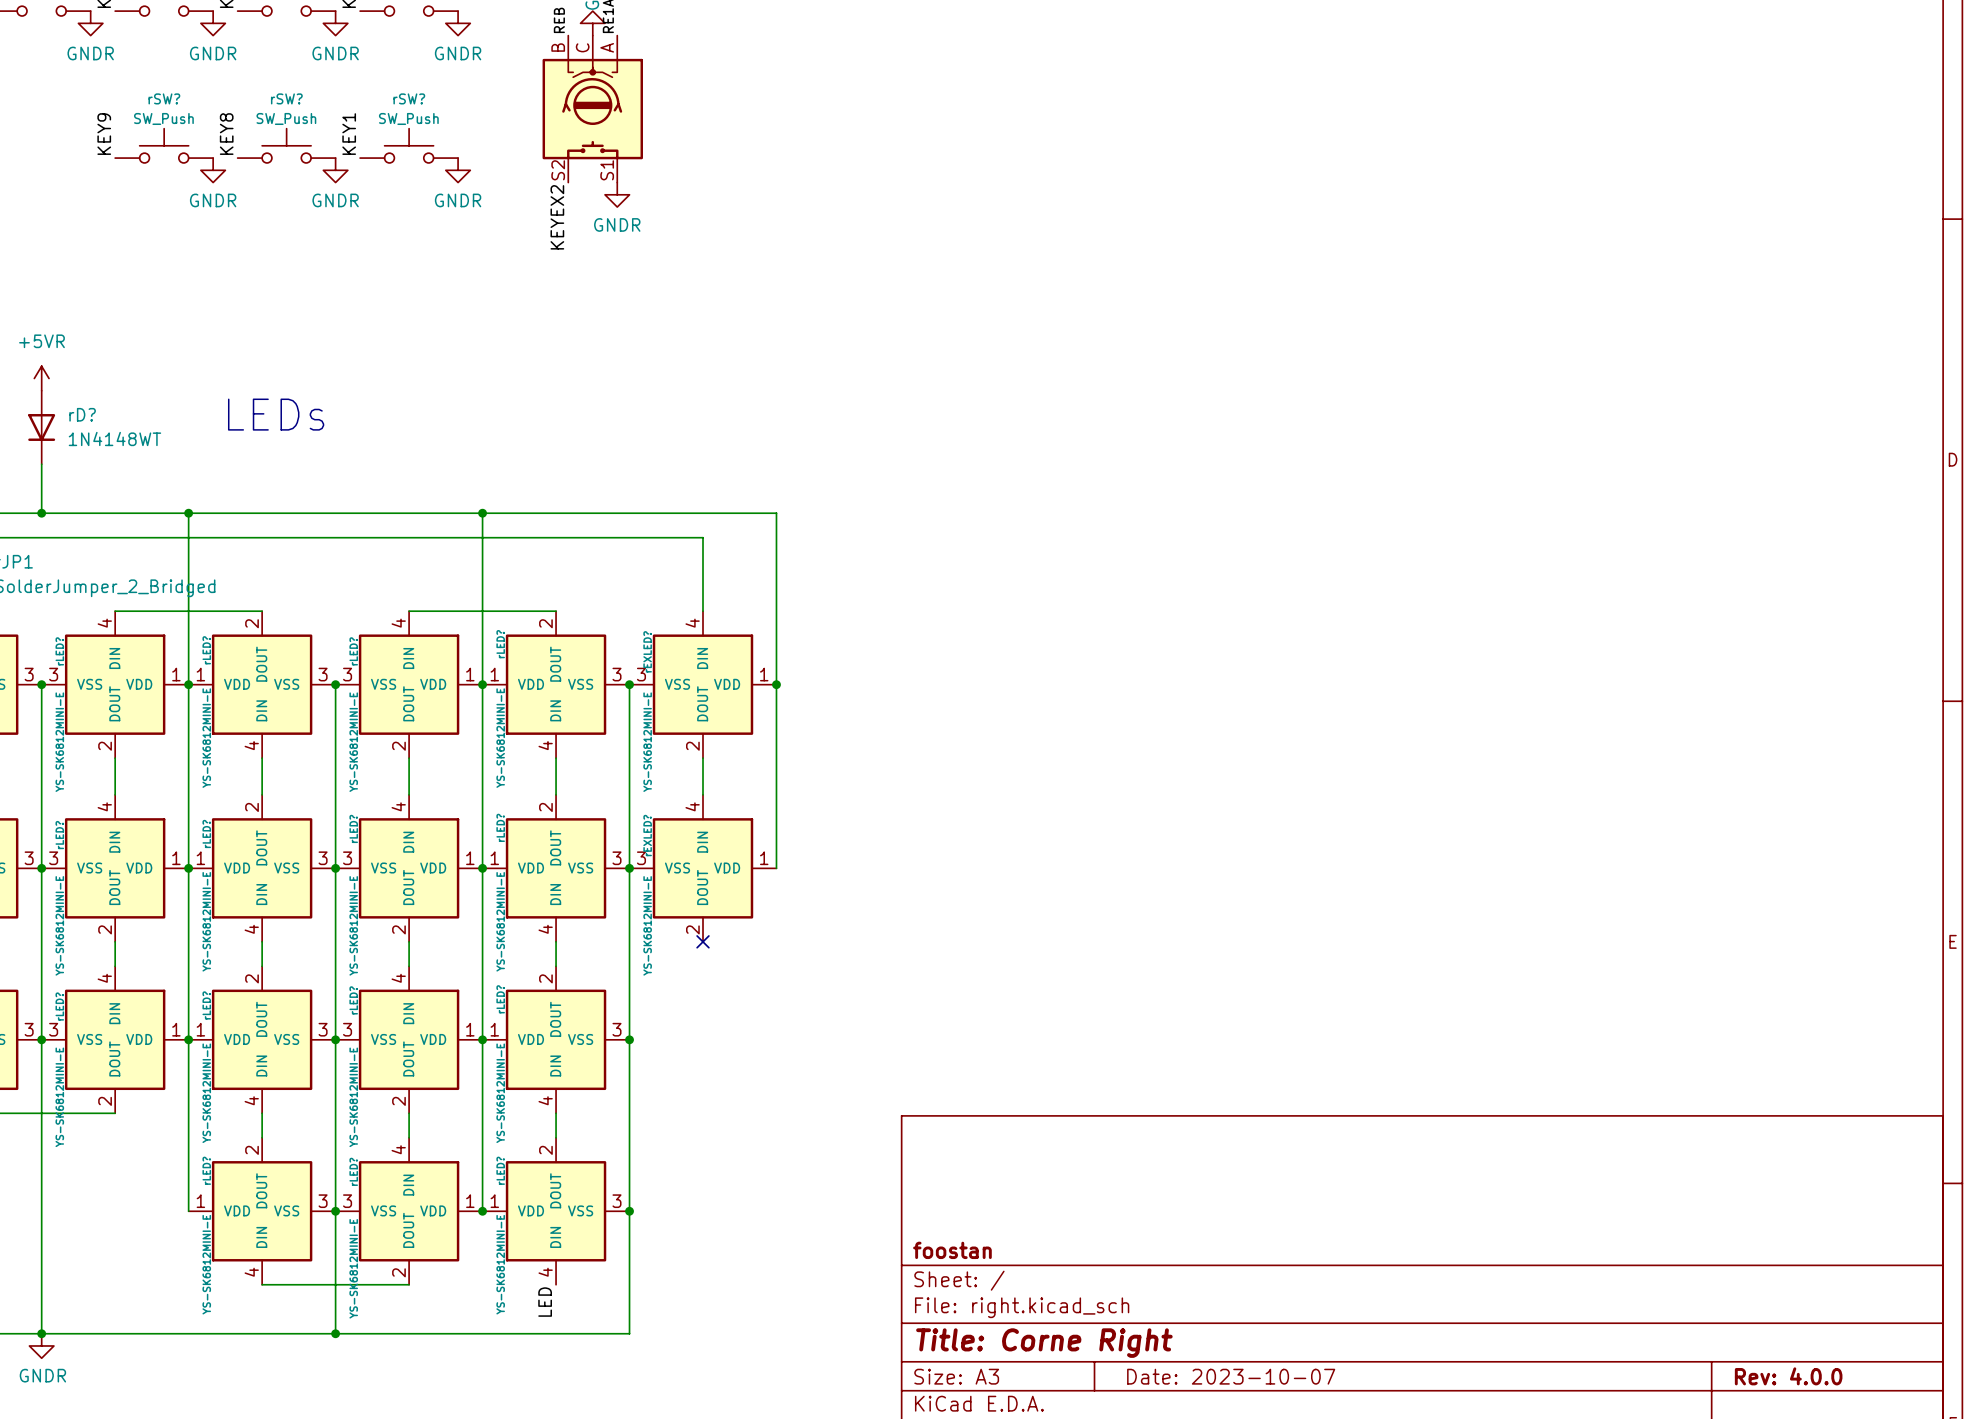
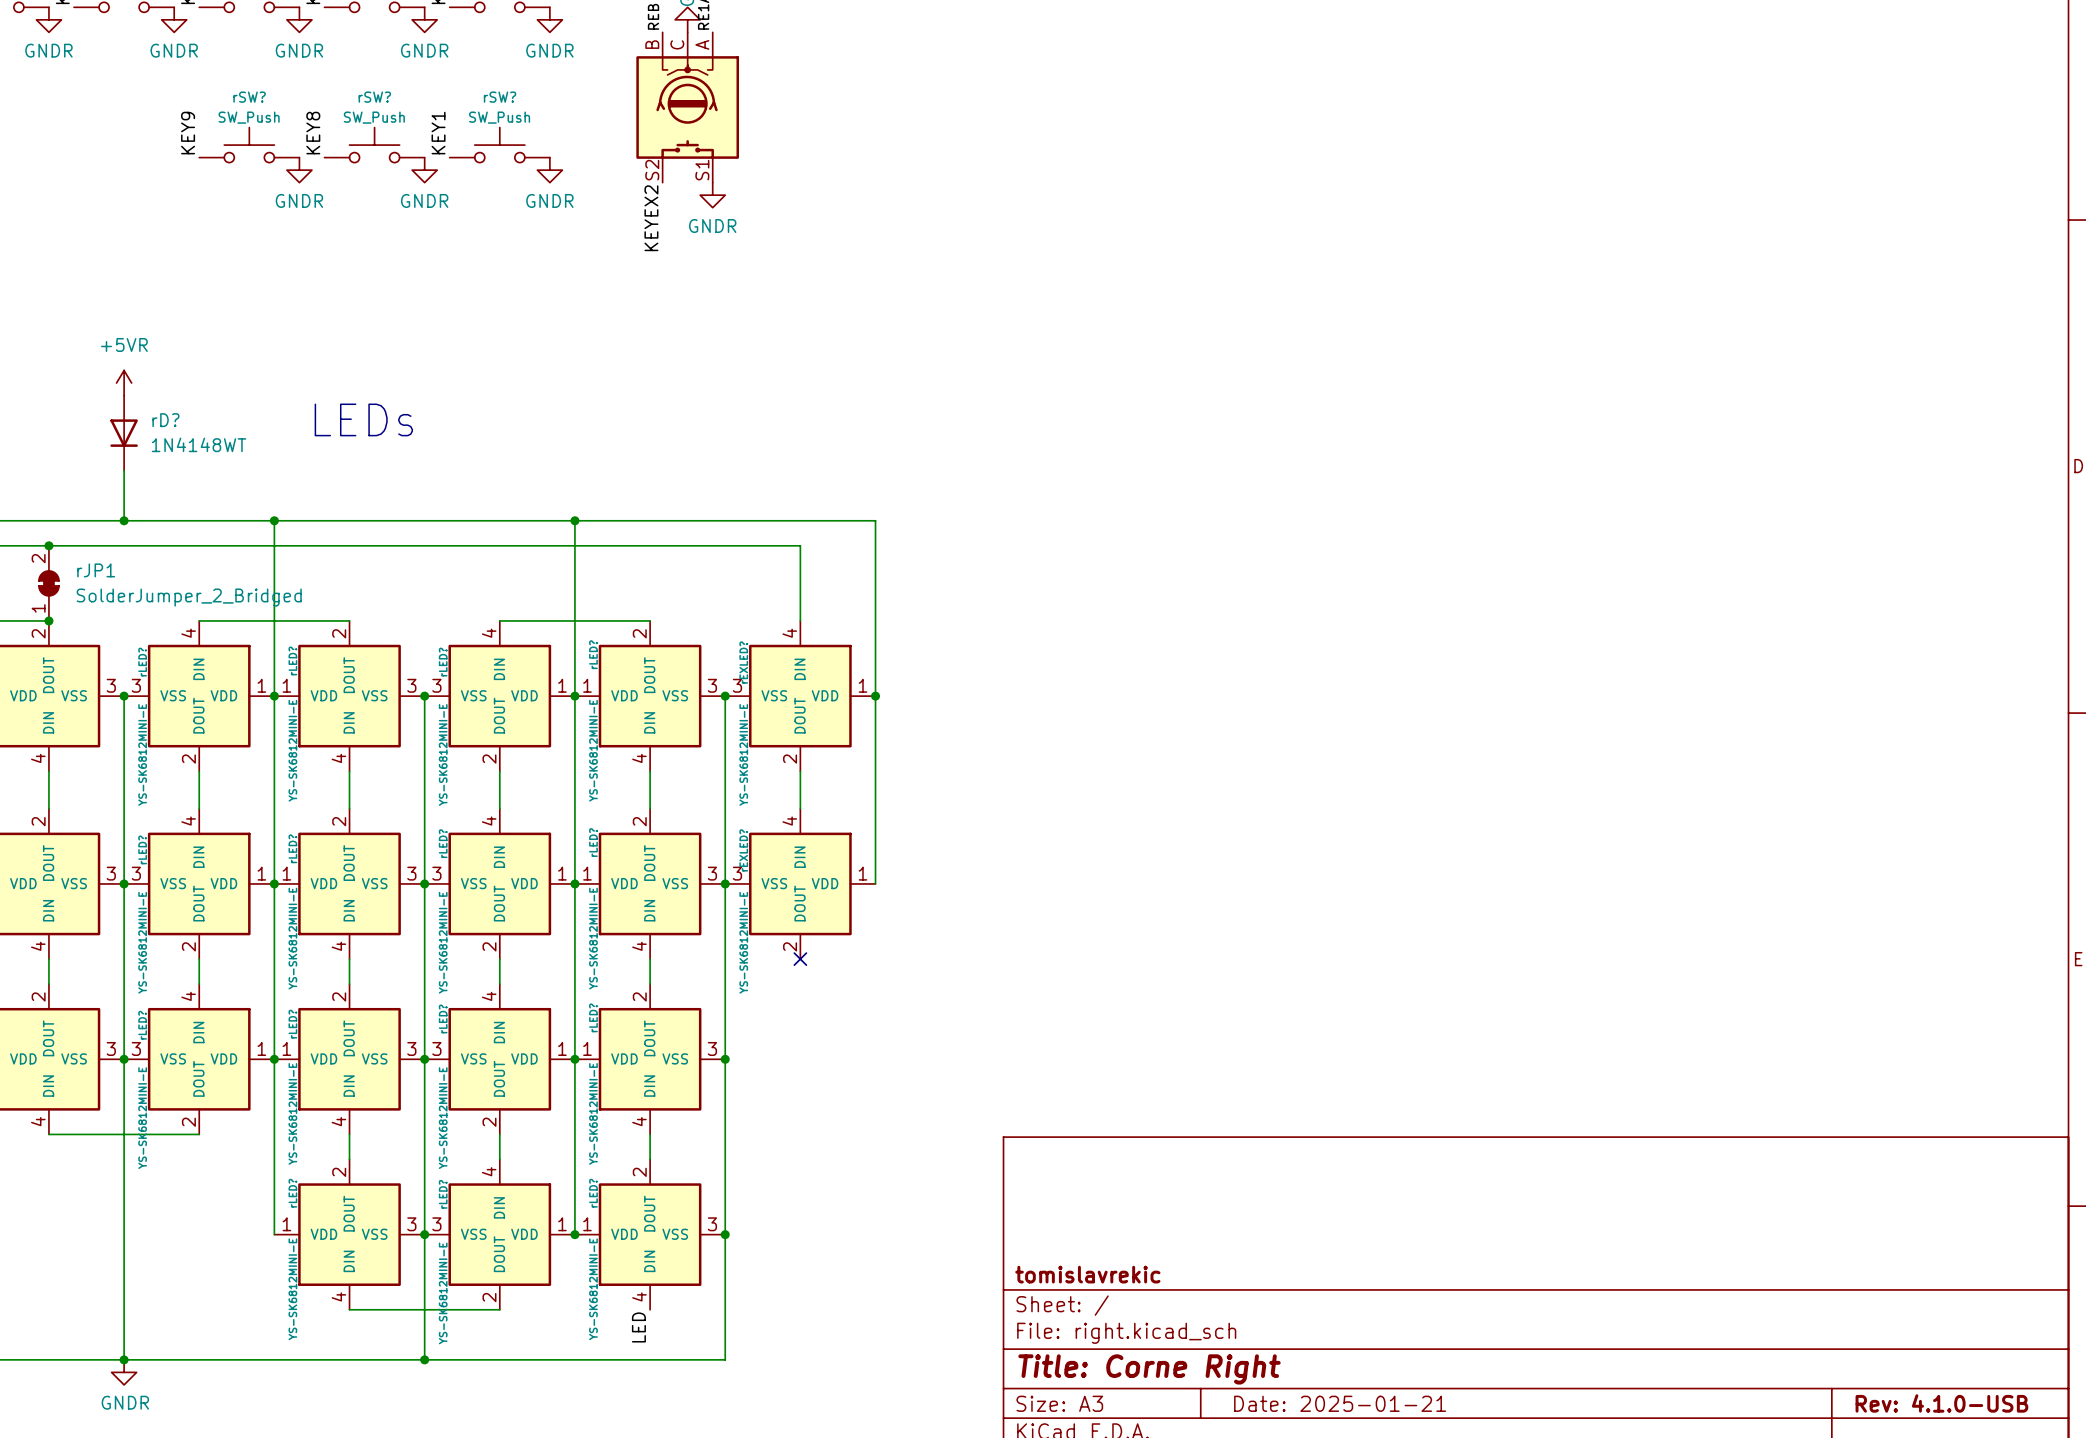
title block: foostan (952, 1250) -> tomislavrekic (1087, 1274)
title block: Date: 2023-10-07 (1231, 1376) -> Date: 2025-01-21 (1340, 1403)
title block: Rev: 4.0.0 (1788, 1376) -> Rev: 4.1.0-USB (1941, 1403)

